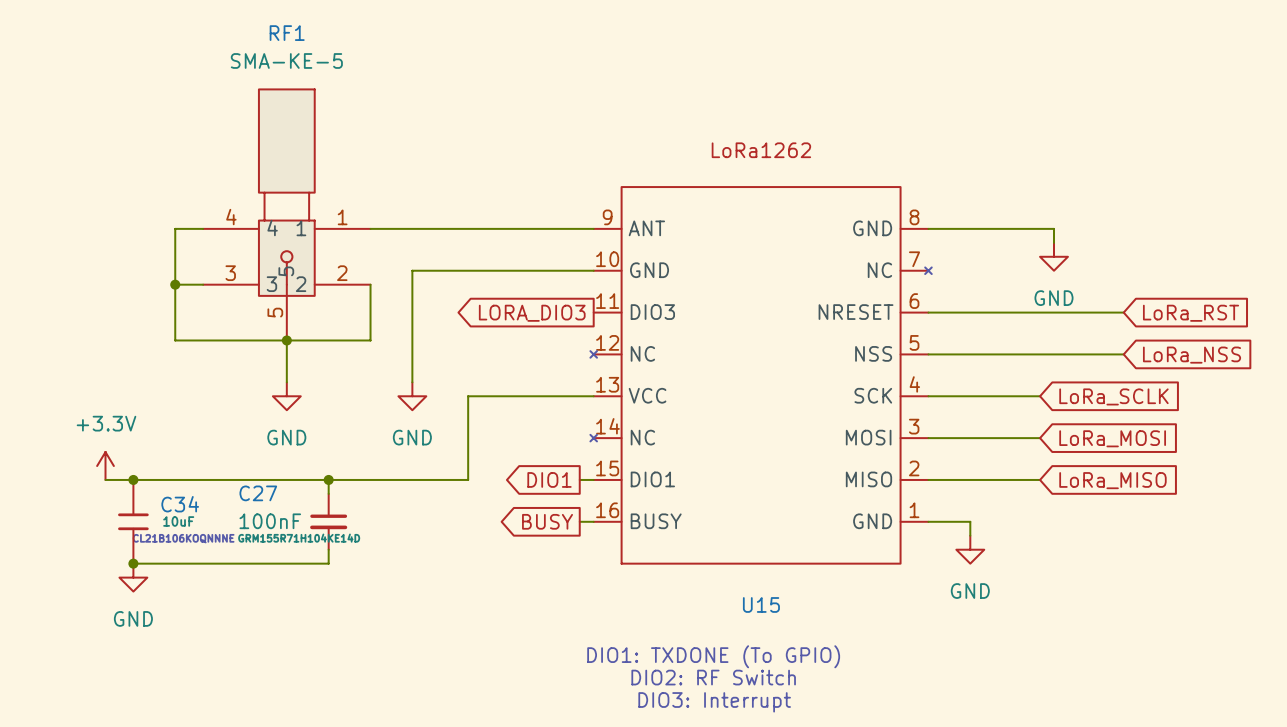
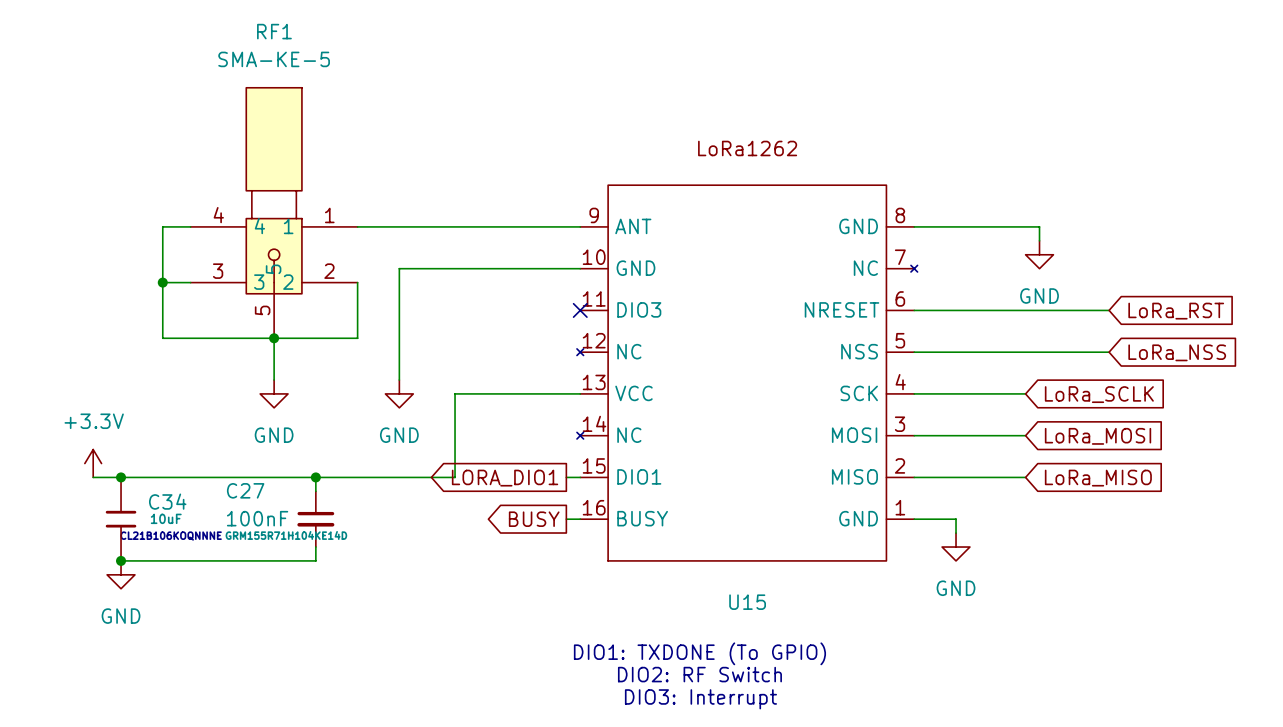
no-connect mark: none -> (580, 310)
global label: LORA_DIO3 (532, 313) -> none
global label: DIO1 (549, 479) -> LORA_DIO1 (505, 478)

